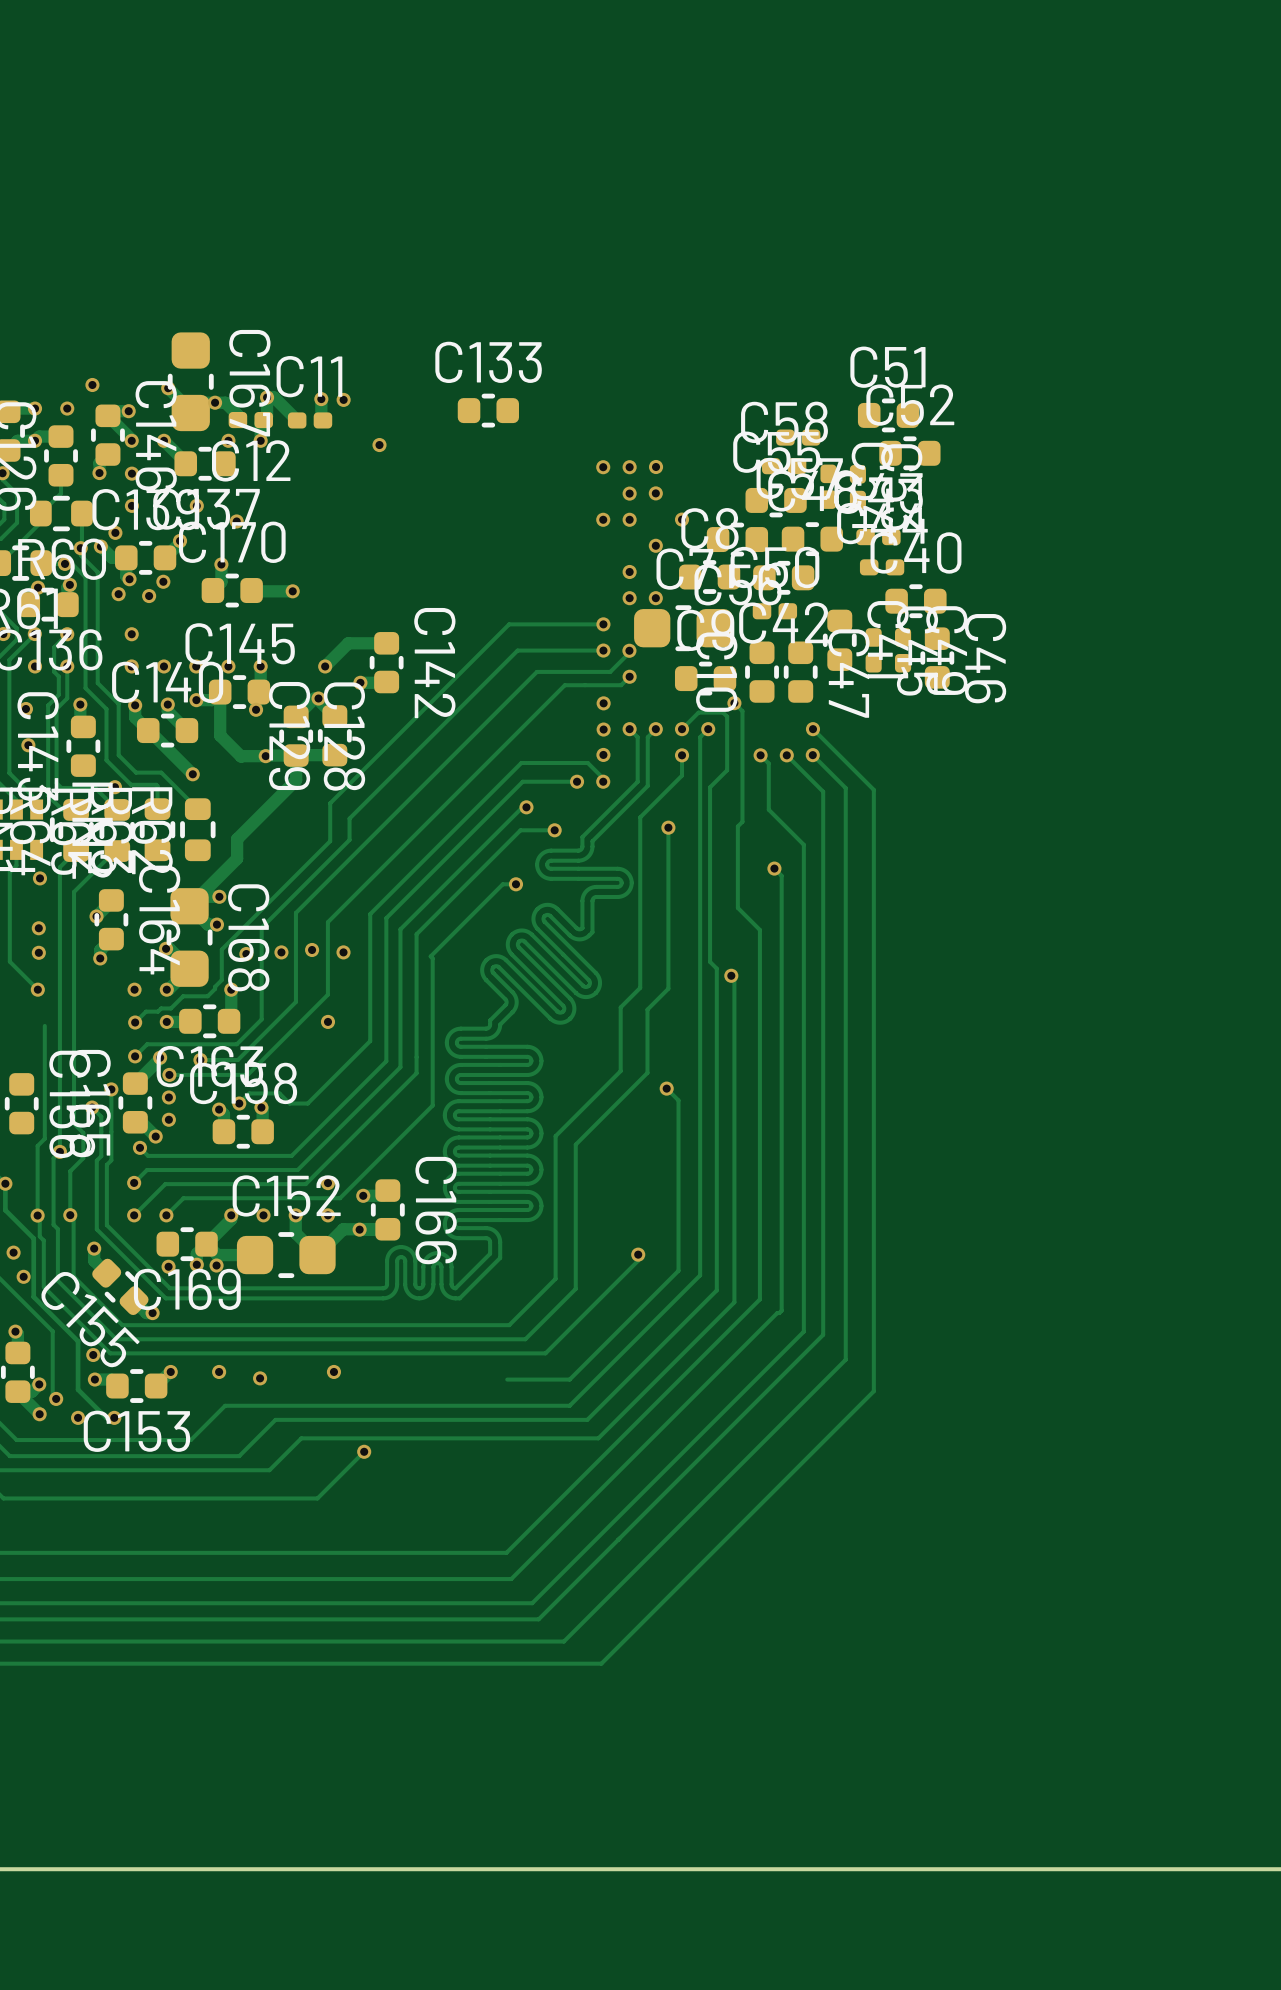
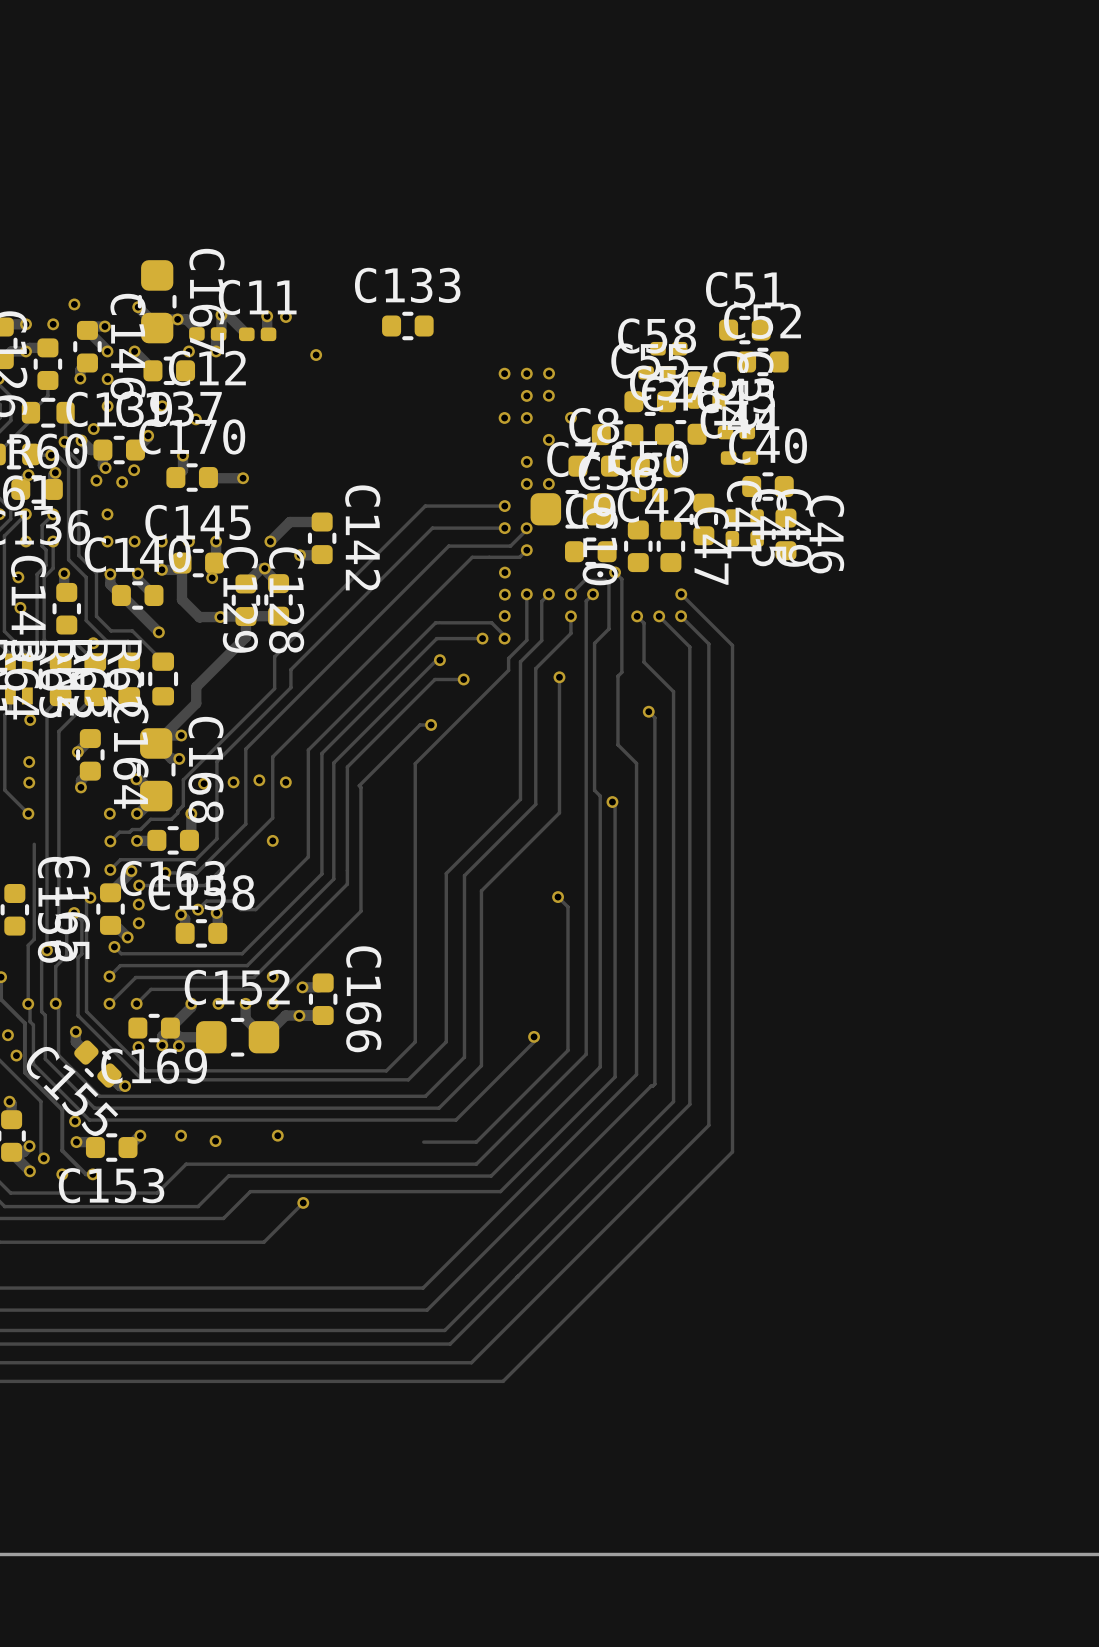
track: (629, 729) (637, 737) (637, 781) (582, 837) (580, 849) (547, 851) (541, 854) (537, 861) (538, 871) (547, 878) (617, 878) (621, 880) (621, 884) (618, 886) (594, 887) (585, 892) (582, 899) (582, 928) -> none
track: (647, 737) (647, 785) (592, 841) (592, 850) (586, 857) (580, 860) (550, 860) (547, 863) (547, 866) (550, 868) (619, 868) (626, 871) (631, 879) (630, 888) (624, 895) (593, 898) (592, 932) (589, 935) (579, 939) (569, 935) -> (541, 601) (541, 640) (520, 661) (520, 799) (446, 873) (446, 1041) (408, 1079) (142, 1079) (136, 1073)
track: (582, 928) (577, 928) (551, 905) (540, 906) (533, 915) (536, 927) (589, 980) (589, 984) (586, 986) (583, 985) (528, 932) (516, 931) (508, 940) (510, 953) (563, 1006) (562, 1011) (557, 1011) (504, 959) (492, 956) (484, 963) (482, 973) (505, 999) (506, 1004) (490, 1020) (488, 1028) (457, 1029) (447, 1037) (447, 1048) (457, 1056) (527, 1056) (531, 1060) (527, 1064) (459, 1065) (450, 1069) (447, 1075) (448, 1086) (457, 1092) (527, 1093) (531, 1097) (527, 1101) (457, 1101) (450, 1104) (445, 1109) (445, 1120) (455, 1128) (527, 1129) (531, 1133) (527, 1137) (457, 1137) (450, 1140) (445, 1146) (445, 1156) (455, 1165) (527, 1165) (531, 1169) (527, 1173) (457, 1173) (446, 1180) (445, 1193) (455, 1201) (527, 1201) (531, 1205) (527, 1209) (458, 1209) (448, 1214) (444, 1224) (450, 1235) (457, 1238) (486, 1238) (490, 1241) (490, 1253) (455, 1288) (451, 1285) (449, 1260) (444, 1254) (437, 1253) (430, 1254) (425, 1260) (423, 1285) (420, 1288) (416, 1287) (414, 1255) (409, 1249) (401, 1247) (394, 1248) (388, 1255) (387, 1284) (383, 1288) (170, 1288) (106, 1225) (106, 1164) (111, 1160) (111, 1089) -> none
track: (569, 935) (549, 915) (544, 916) (544, 921) (598, 975) (599, 986) (591, 996) (584, 996) (577, 994) (524, 941) (520, 940) (517, 944) (571, 1000) (574, 1008) (570, 1018) (562, 1022) (551, 1019) (499, 967) (495, 966) (492, 968) (492, 972) (515, 996) (514, 1009) (500, 1024) (498, 1031) (493, 1036) (460, 1038) (457, 1041) (460, 1046) (531, 1047) (537, 1050) (541, 1059) (539, 1067) (531, 1074) (460, 1074) (457, 1078) (460, 1083) (529, 1083) (537, 1087) (540, 1093) (539, 1104) (531, 1110) (458, 1111) (454, 1114) (458, 1119) (529, 1119) (535, 1122) (540, 1129) (539, 1140) (531, 1147) (458, 1147) (455, 1150) (455, 1153) (458, 1155) (529, 1155) (535, 1158) (540, 1164) (540, 1175) (531, 1183) (458, 1183) (455, 1186) (455, 1189) (458, 1191) (529, 1191) (539, 1198) (540, 1211) (531, 1219) (458, 1220) (455, 1221) (455, 1225) (458, 1228) (487, 1228) (496, 1232) (500, 1242) (500, 1257) (497, 1260) -> (526, 594) (526, 640) (508, 658) (508, 670) (415, 763) (415, 1041)
track: (640, 978) (640, 987) (620, 1007) (620, 1071) (555, 1136) -> (535, 804) (464, 875) (464, 937)
track: (647, 1009) (647, 1072) (575, 1144) -> (541, 830) (481, 890) (481, 944)
track: (462, 1294) (459, 1298) (453, 1298) (444, 1292) (441, 1286) (441, 1266) (437, 1263) (433, 1266) (433, 1286) (430, 1292) (421, 1298) (412, 1296) (405, 1287) (405, 1260) (401, 1257) (397, 1260) (396, 1289) (391, 1295) (384, 1298) (165, 1298) -> (386, 1070) (145, 1070) (86, 1011) (86, 901) (90, 897)

